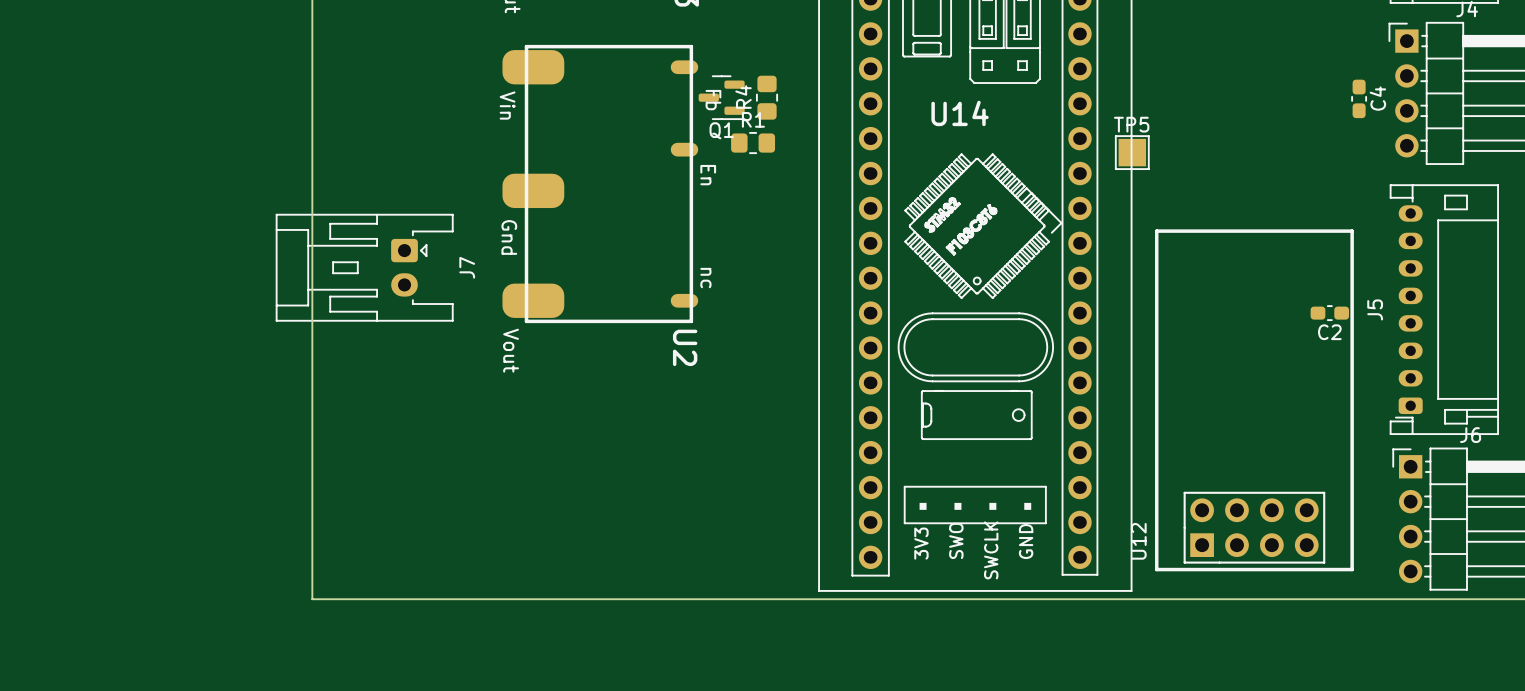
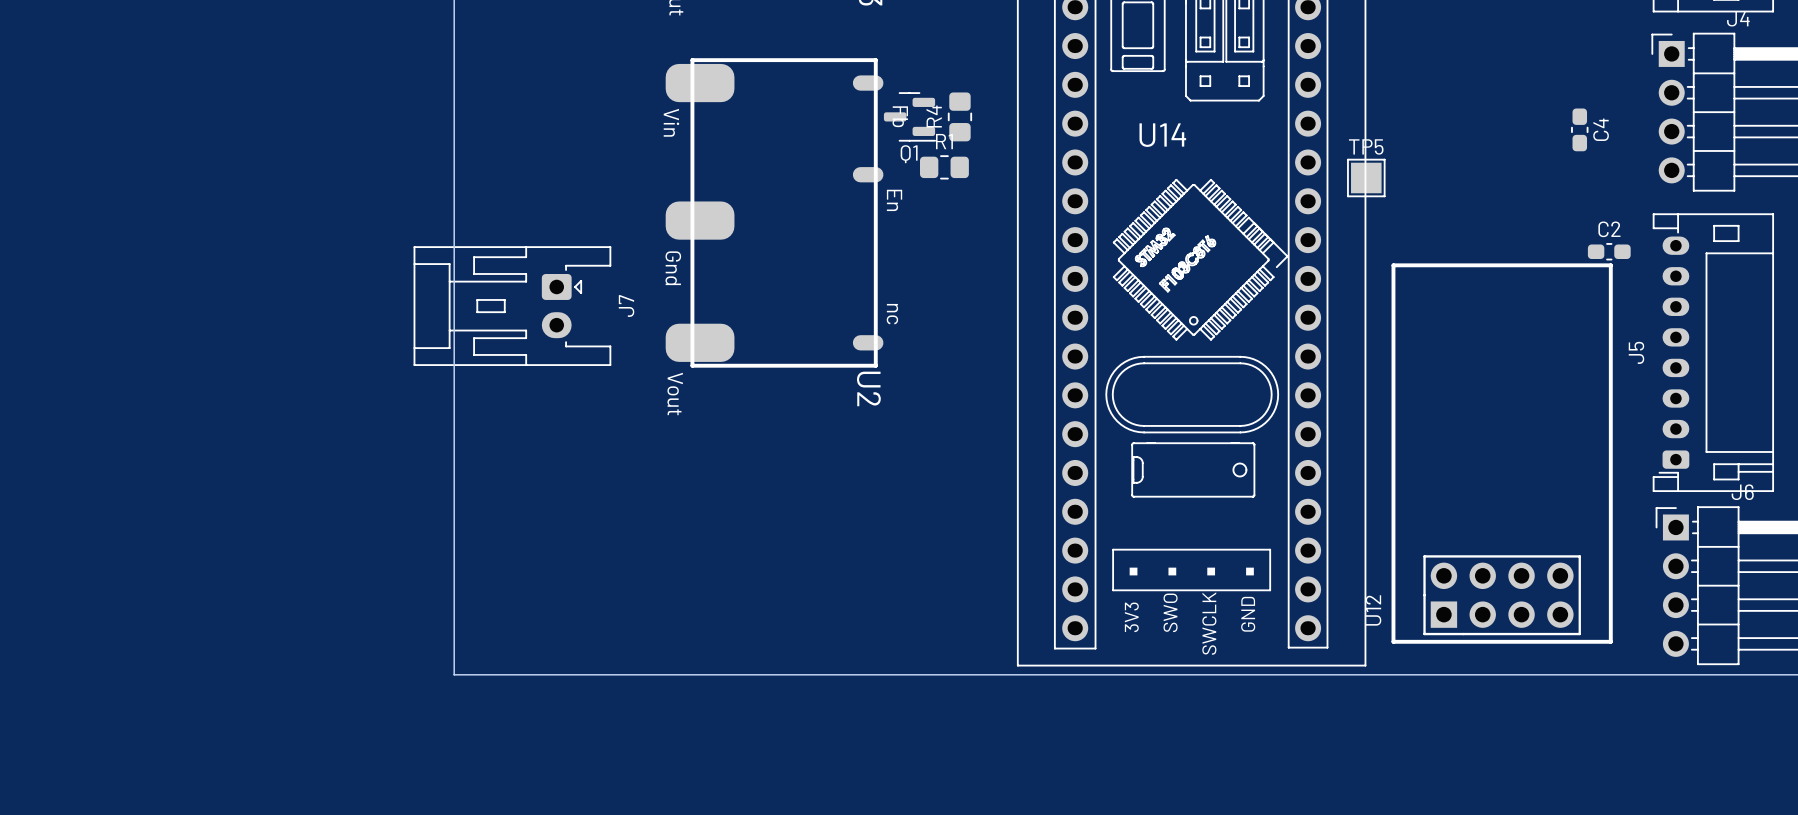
C4 position: (1359, 98) -> (1579, 129)
C2 position: (1329, 313) -> (1609, 251)
C2 name position: C2 (1329, 332) -> C2 (1609, 229)

